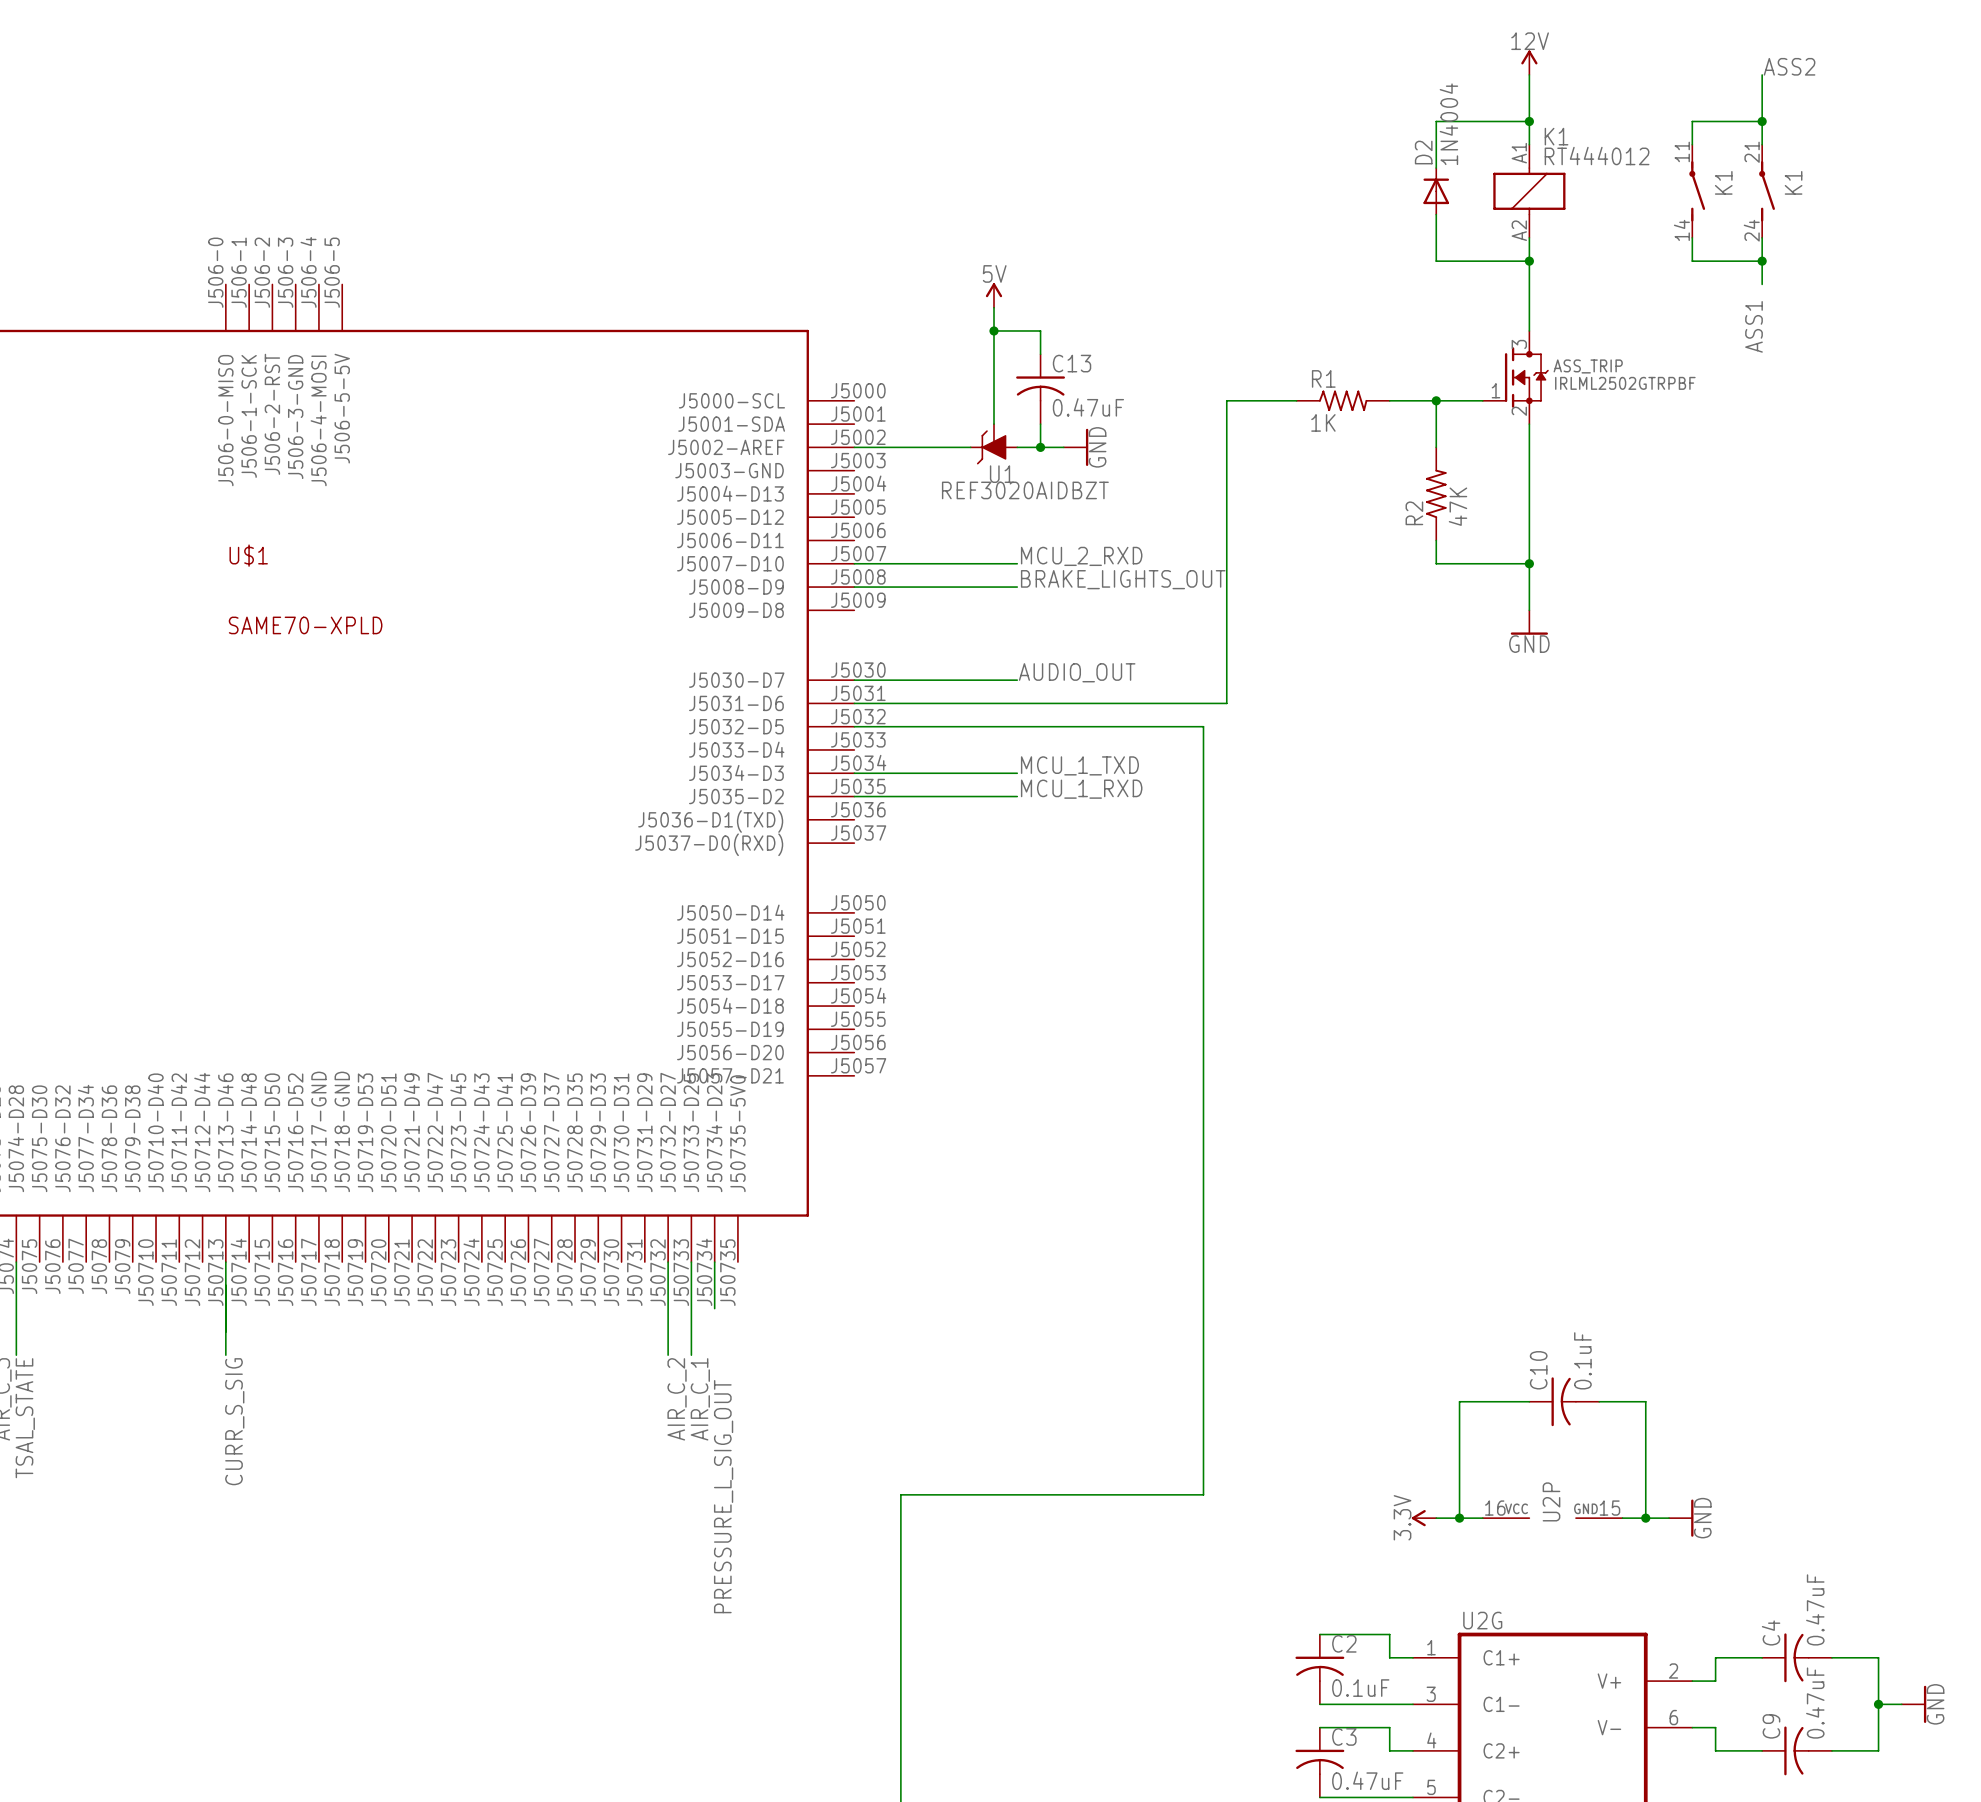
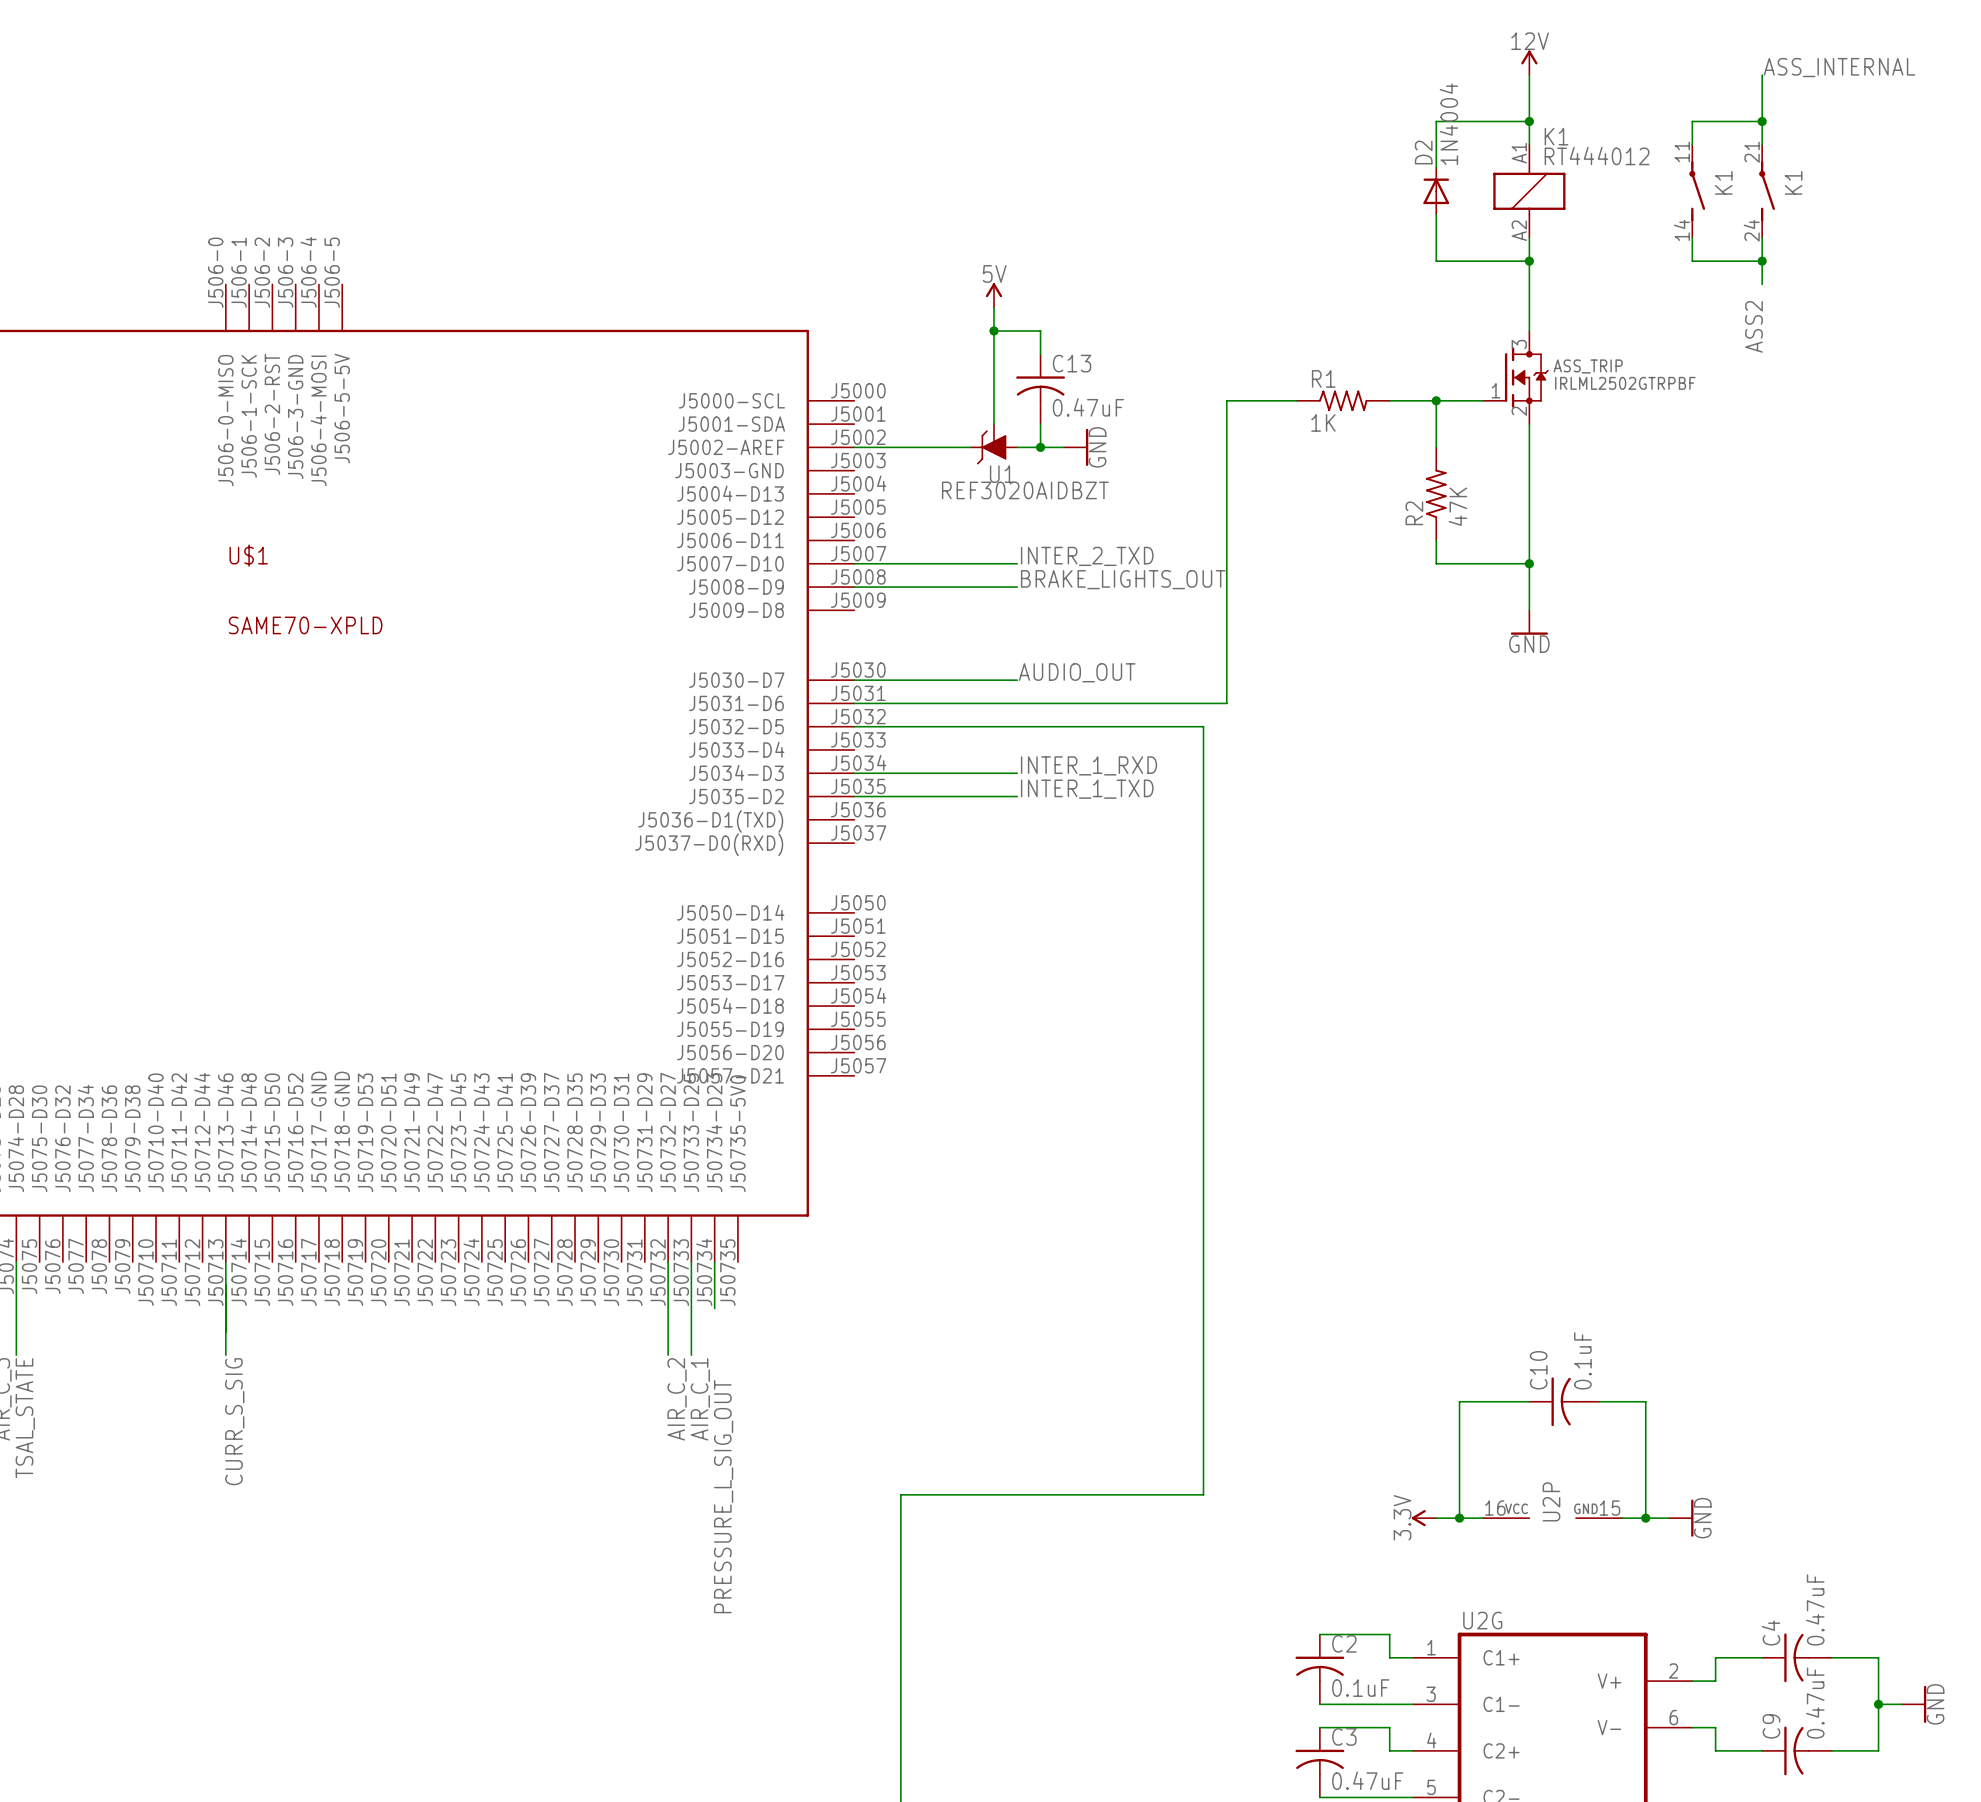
label: ASS2 (1789, 66) -> ASS_INTERNAL (1839, 67)
label: ASS1 (1754, 326) -> ASS2 (1754, 326)
label: MCU_2_RXD (1081, 556) -> INTER_2_TXD (1087, 556)
label: MCU_1_TXD (1079, 765) -> INTER_1_RXD (1089, 765)
label: MCU_1_RXD (1081, 789) -> INTER_1_TXD (1087, 789)

